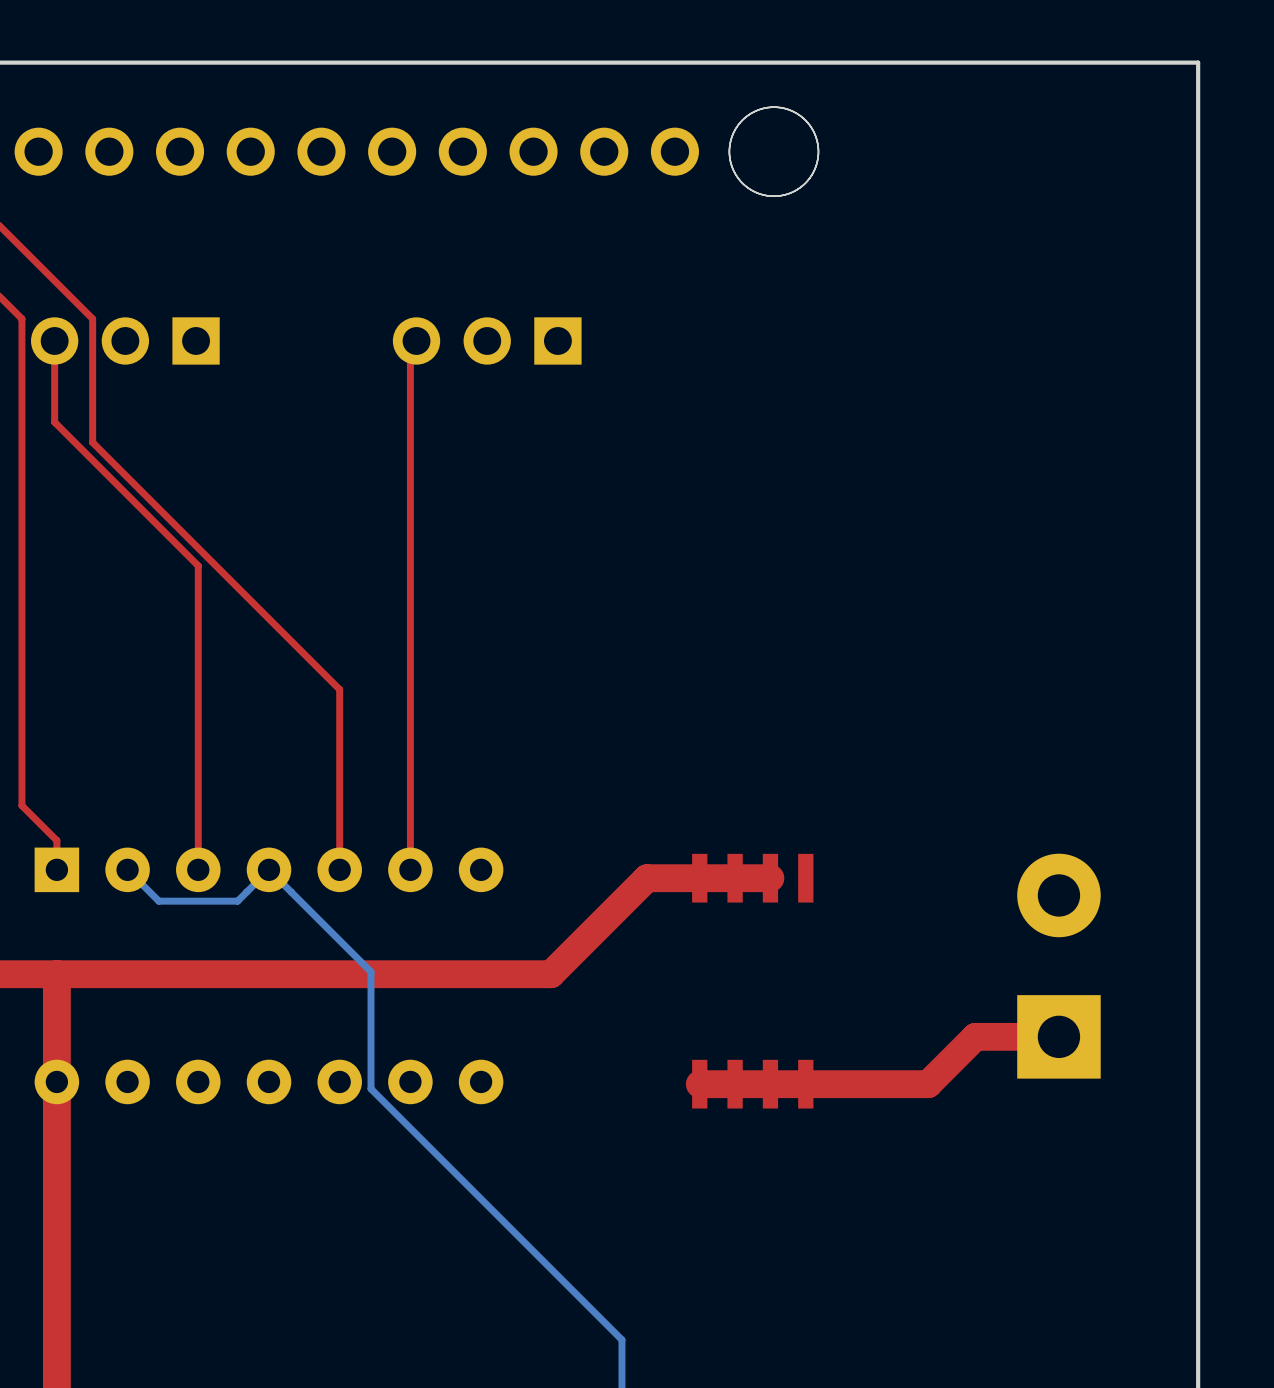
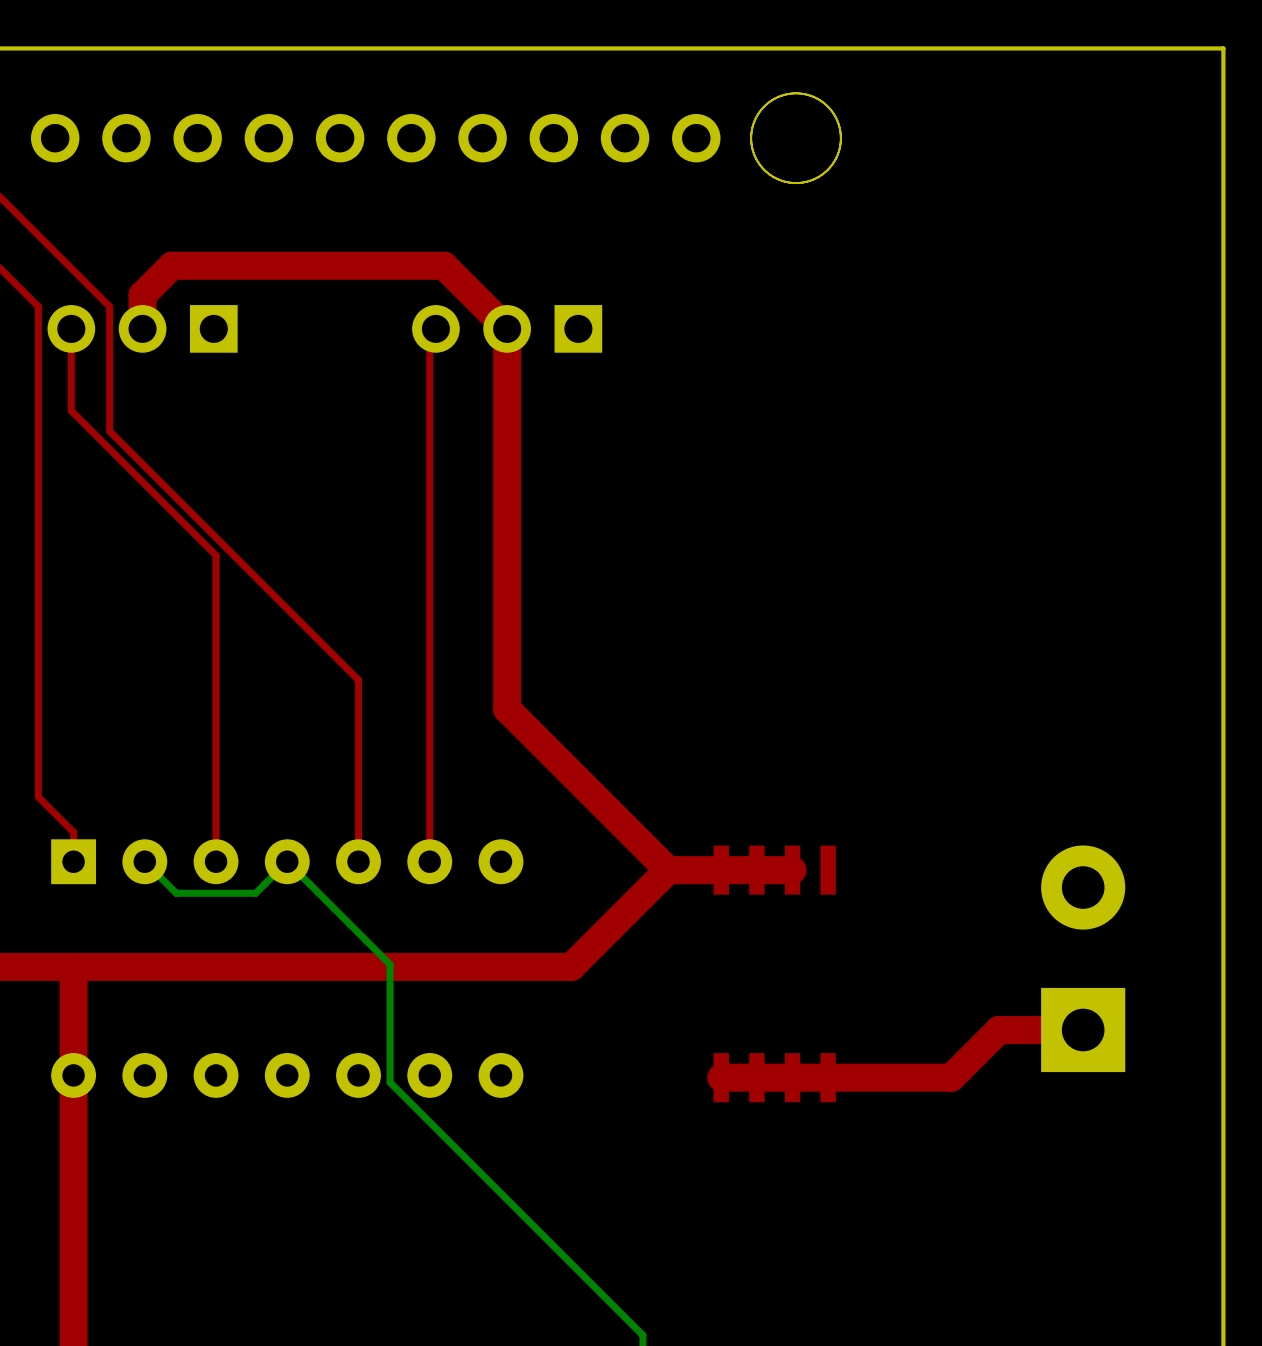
top track: none -> (142, 328) (142, 295) (171, 265) (444, 265) (507, 328) (507, 709) (668, 870)

